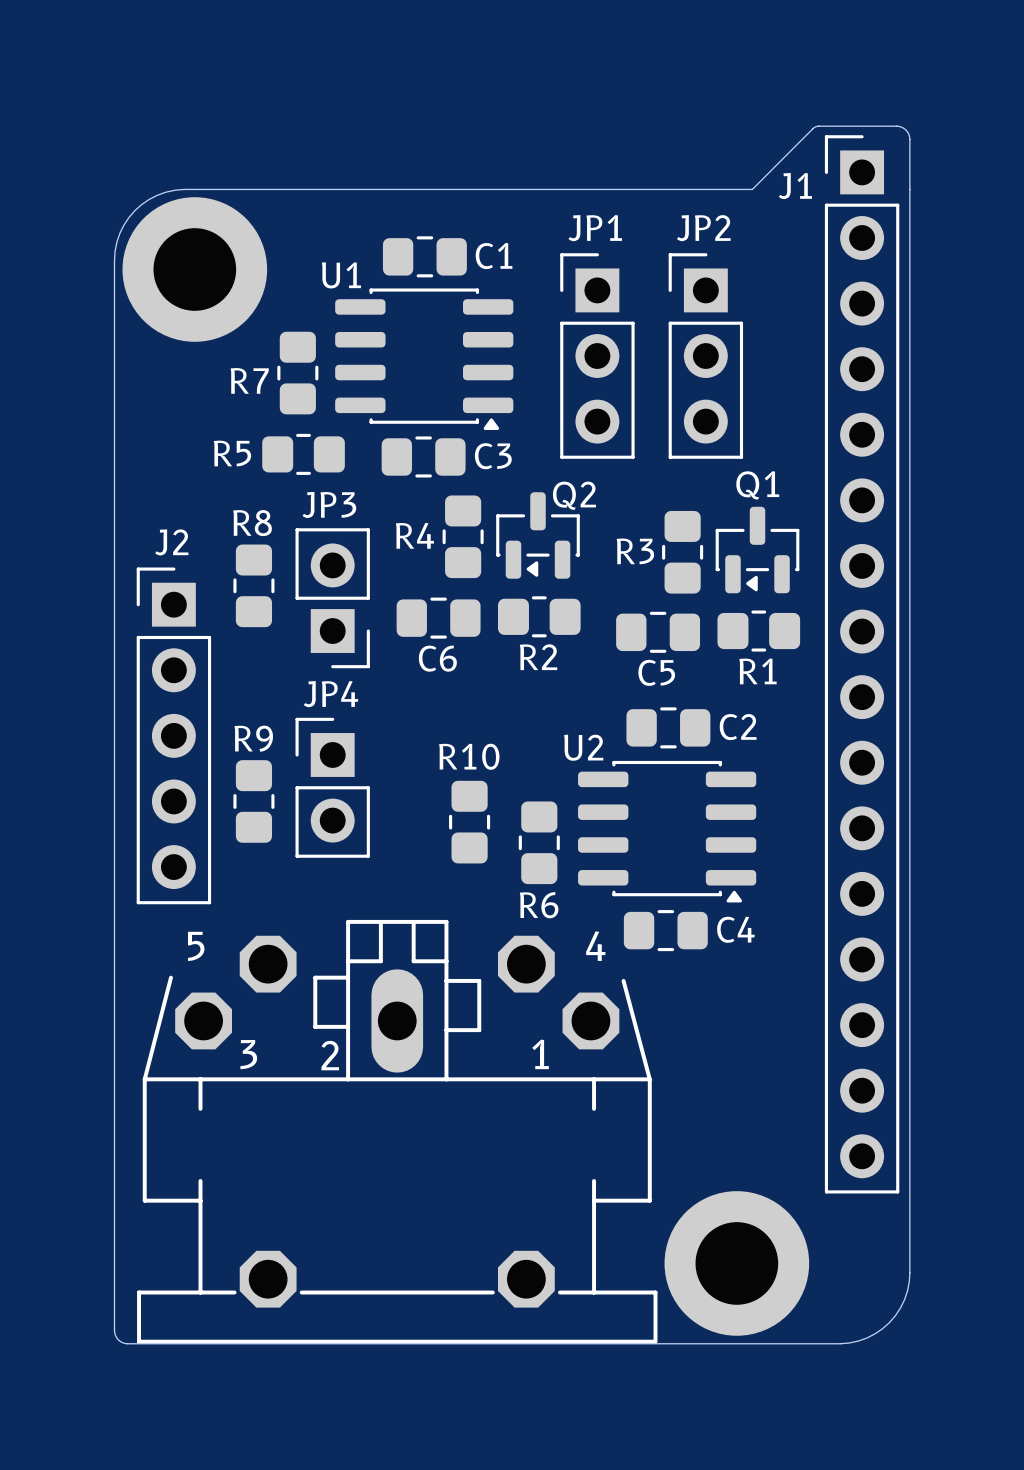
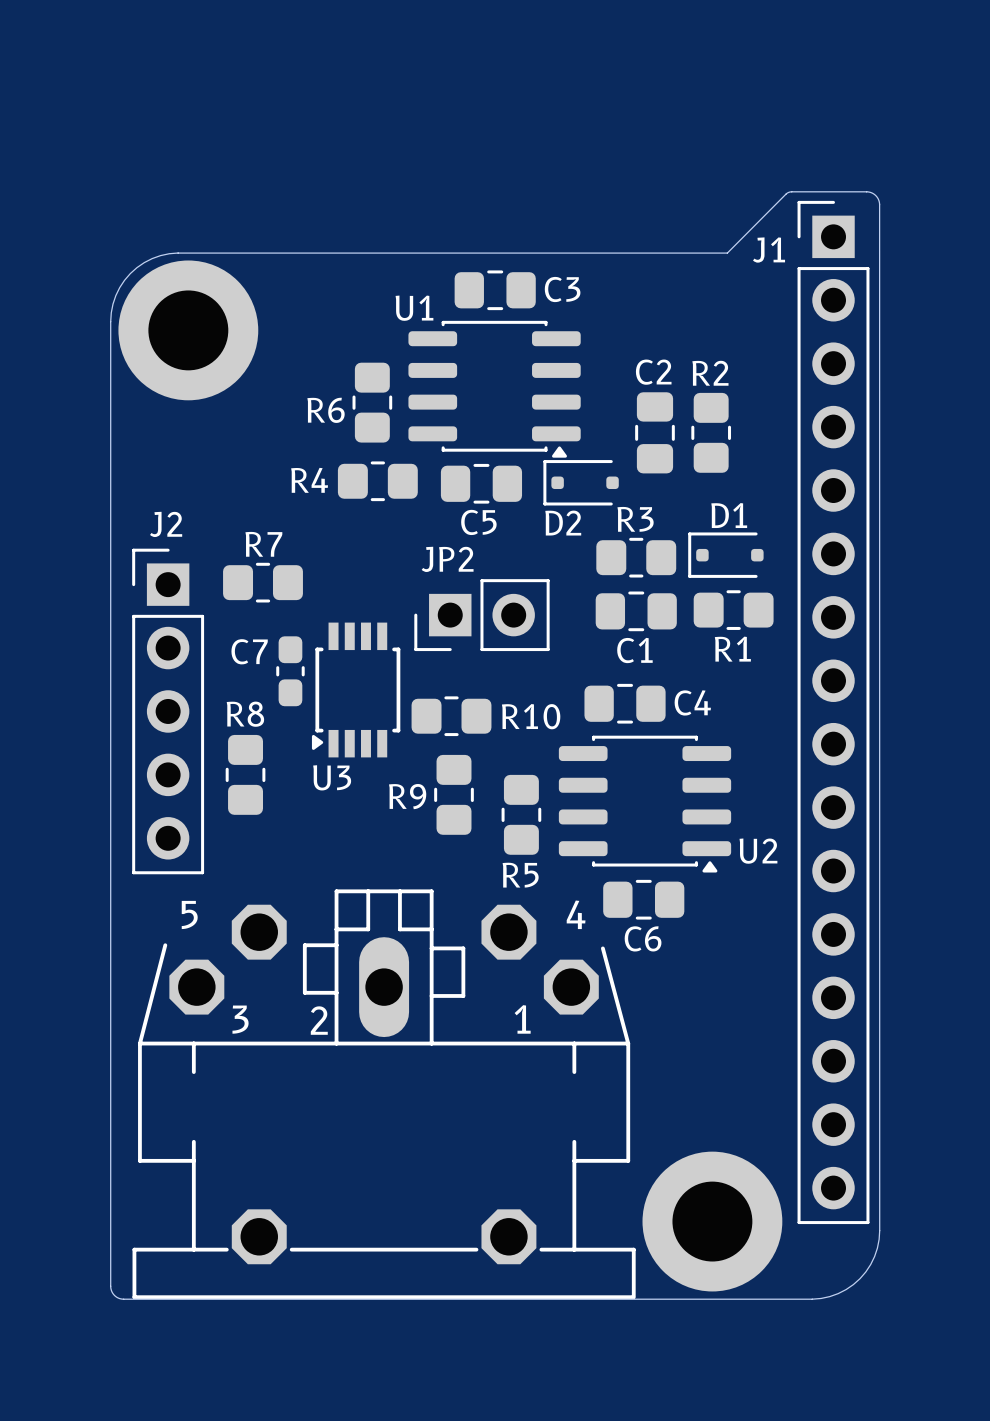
board edge: none -> (879, 204) (875, 195) (868, 191) (789, 192) (727, 253) (169, 253) (152, 258) (130, 273) (115, 295) (110, 321)
JP2 name position: JP2 (703, 228) -> JP2 (447, 559)
JP2 footprint: [668, 253, 744, 459] -> [414, 579, 550, 652]
C1: (424, 256) -> none
part position: (194, 269) -> (188, 330)
board edge: (114, 332) (114, 260) (119, 233) (128, 217) (141, 204) (166, 192) (184, 189) (752, 189) (815, 126) (896, 126) (906, 131) (909, 139) (909, 1272) -> (879, 204) (879, 1230)
JP1: (597, 356) -> none
U1 position: (424, 359) -> (494, 389)
R7 rotation: 0° (297, 373) -> 90° clockwise (263, 582)
R7 position: (297, 373) -> (263, 582)
R6: none -> (372, 402)
R5: (303, 454) -> none
C3 position: (423, 456) -> (495, 290)
D2: none -> (581, 482)
C5: none -> (481, 483)
Q2: (538, 535) -> none
R4 rotation: 0° (463, 536) -> 90° clockwise (377, 481)
R4 position: (463, 536) -> (377, 481)
Q1: (757, 550) -> none
R3 rotation: 0° (682, 552) -> 90° clockwise (636, 557)
D1: none -> (725, 555)
R8: (253, 585) -> none
JP3: (332, 598) -> none
R2 rotation: 0° (539, 616) -> 90° clockwise (711, 432)
R2 position: (539, 616) -> (711, 432)
C6: (438, 618) -> none
R2 name position: R2 (538, 657) -> R2 (710, 373)
J1 position: (862, 664) -> (833, 712)
C5 name: C5 (656, 672) -> C1 (634, 650)
C7: none -> (290, 671)
U3: none -> (356, 690)
C4: none -> (625, 703)
C2 rotation: 0° (668, 727) -> 90° clockwise (654, 432)
C2 position: (668, 727) -> (654, 432)
C2 name position: C2 (738, 727) -> C2 (653, 372)
R9 name: R9 (253, 738) -> R8 (245, 714)
R10: none -> (451, 716)
U2 name position: U2 (583, 747) -> U2 (758, 851)
R10 name: R10 (469, 756) -> R9 (407, 796)
JP4: (332, 787) -> none
R6 name: R6 (539, 905) -> R5 (520, 875)
C4 name: C4 (735, 929) -> C6 (643, 938)

